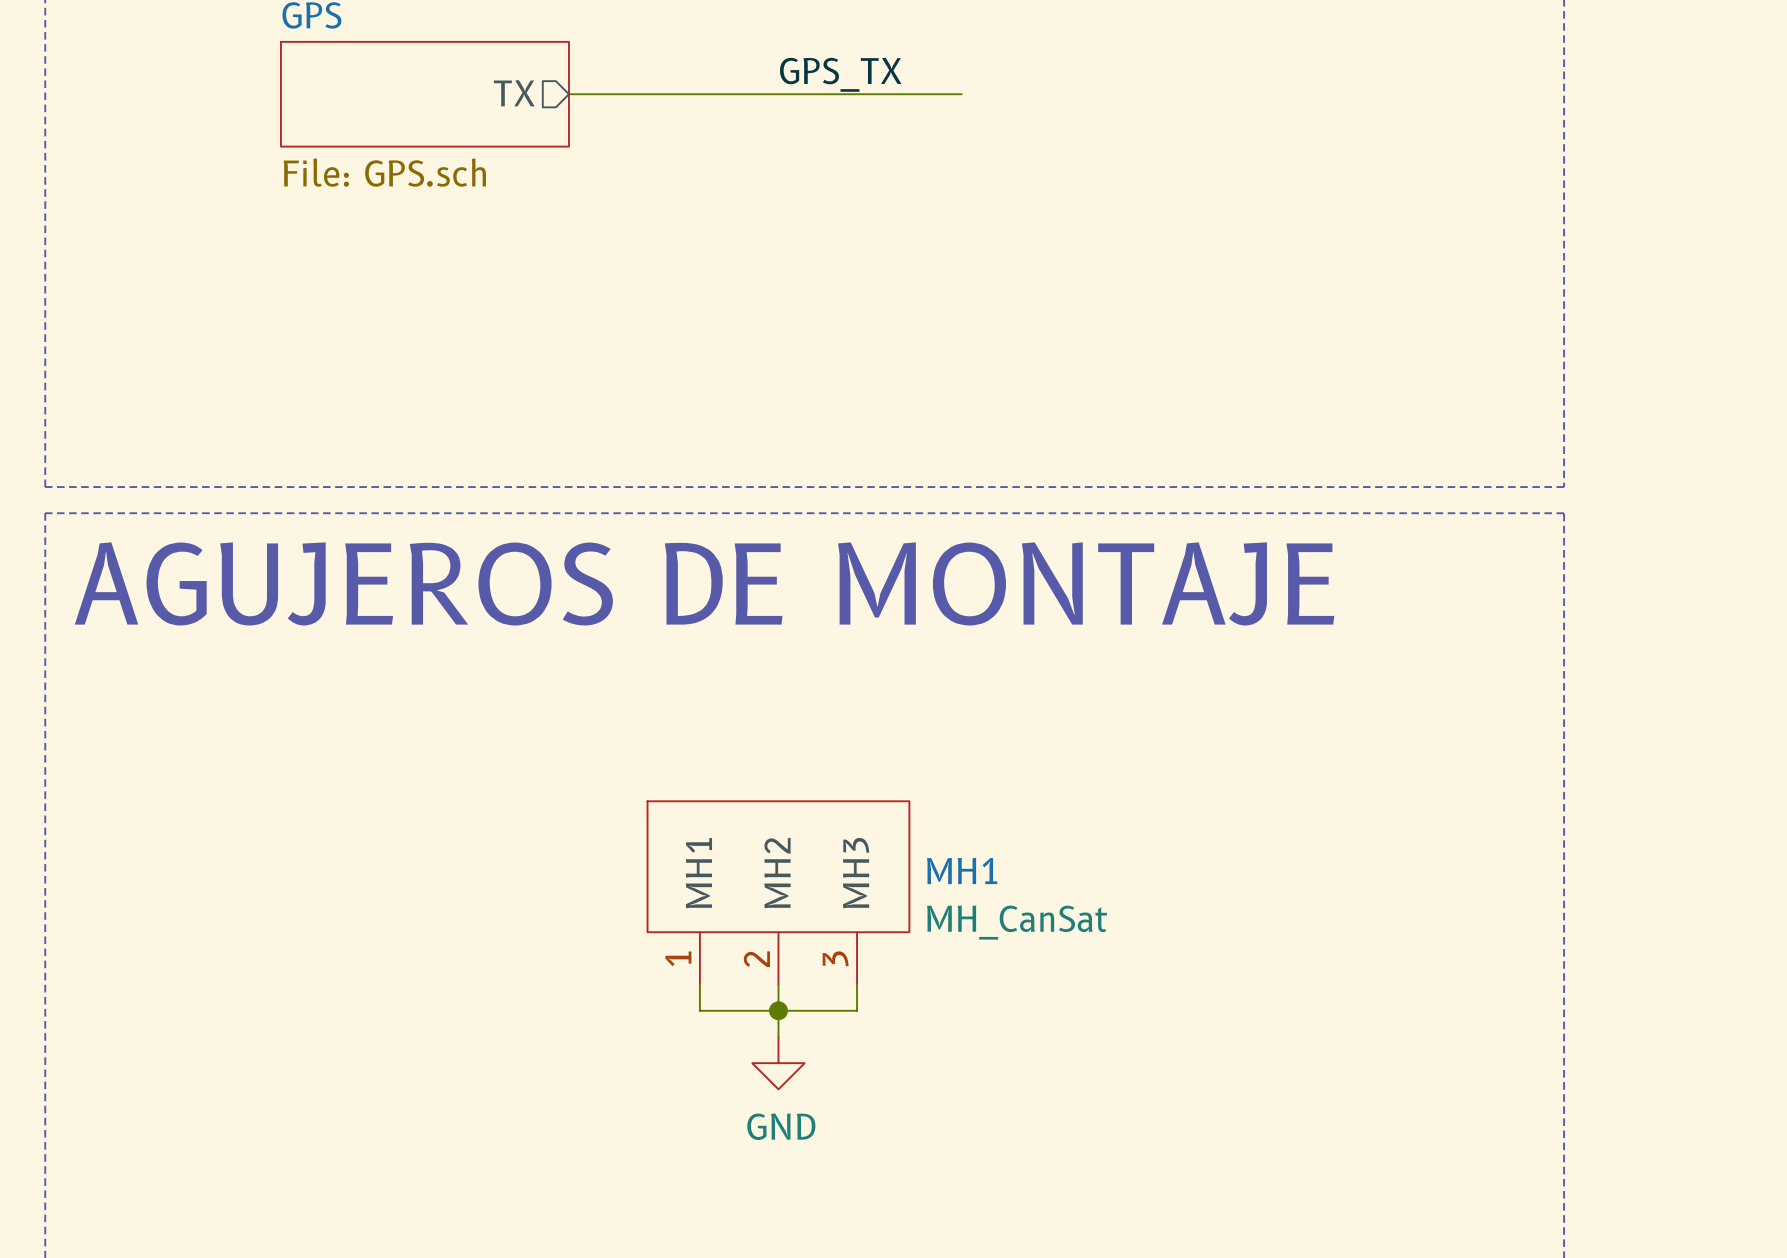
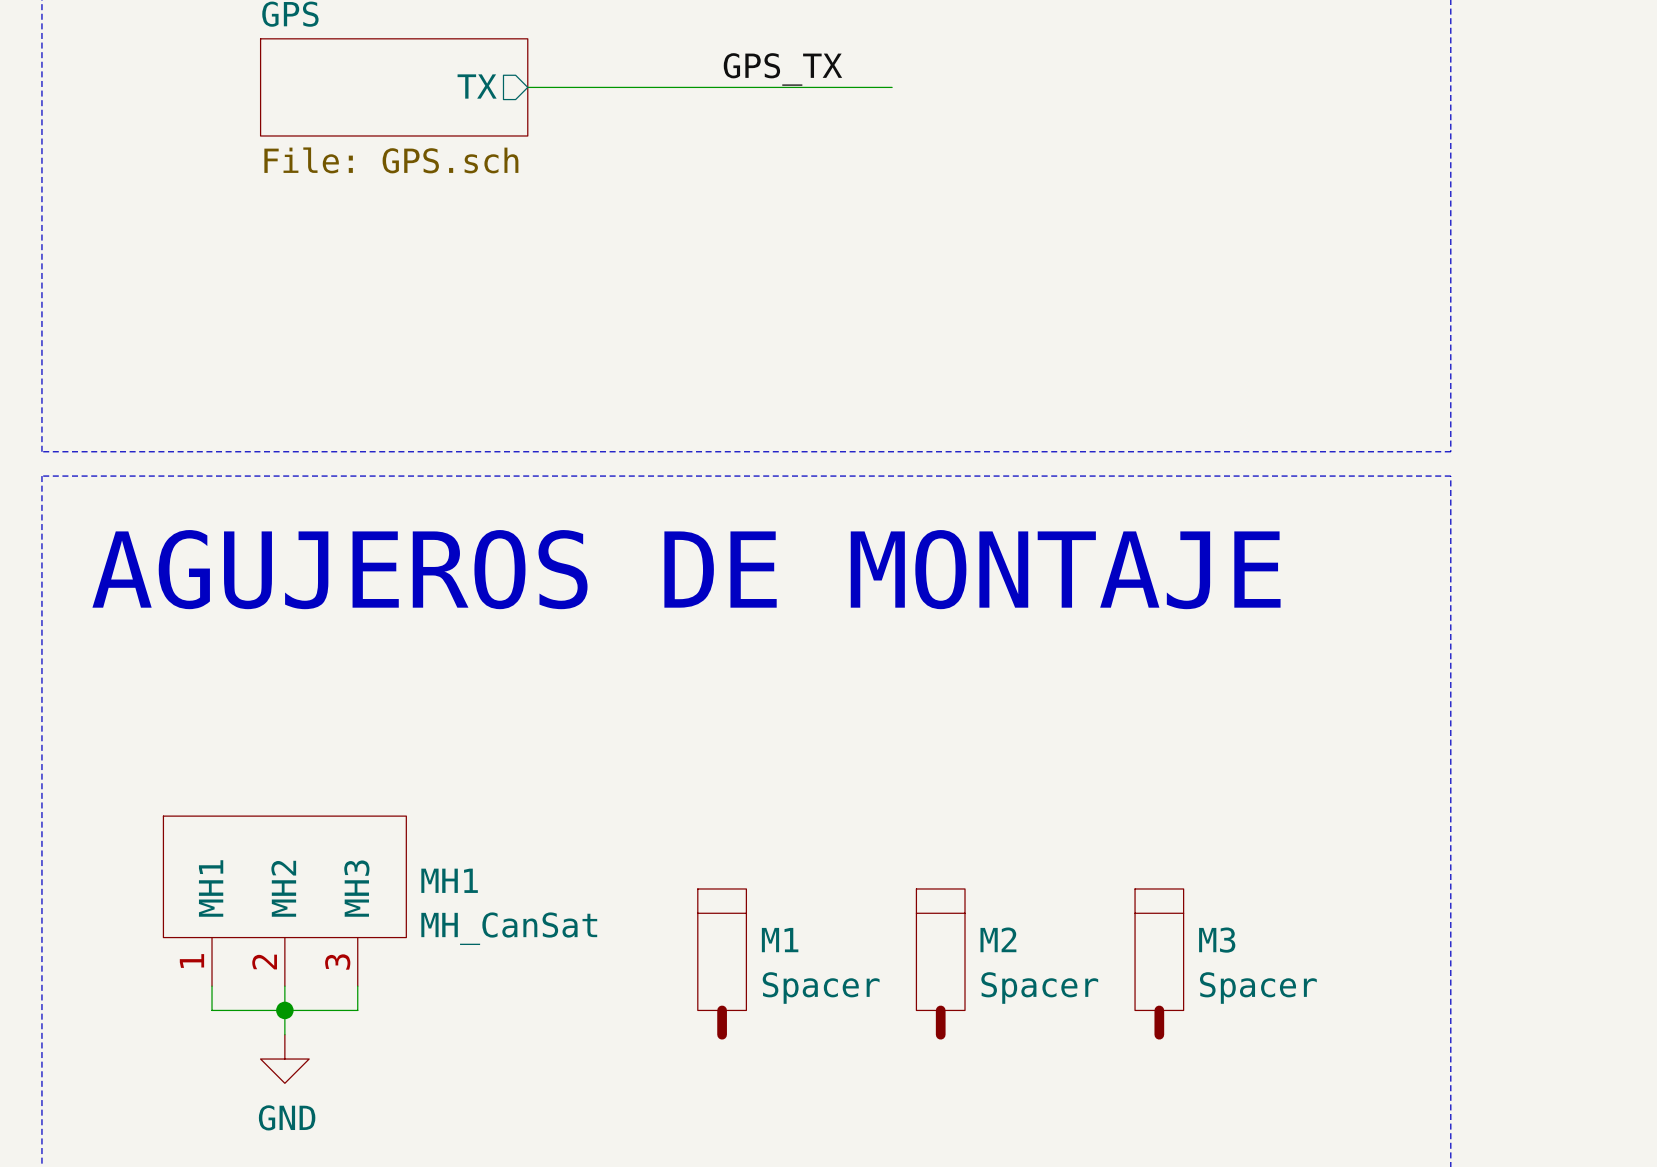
text position: AGUJEROS DE MONTAJE (704, 583) -> AGUJEROS DE MONTAJE (686, 569)
MH1 position: (778, 892) -> (284, 901)
wire: (699, 984) (699, 1010) (857, 1010) (857, 984) -> (212, 986) (212, 1010) (357, 1010) (357, 986)
wire: (778, 984) (778, 1036) -> (284, 986) (284, 1034)
junction: (778, 1010) -> none
M1: none -> Spacer (722, 964)
M2: none -> Spacer (940, 964)
M3: none -> Spacer (1159, 964)
power symbol position: GND (778, 1063) -> GND (284, 1059)
junction: none -> (284, 1010)

